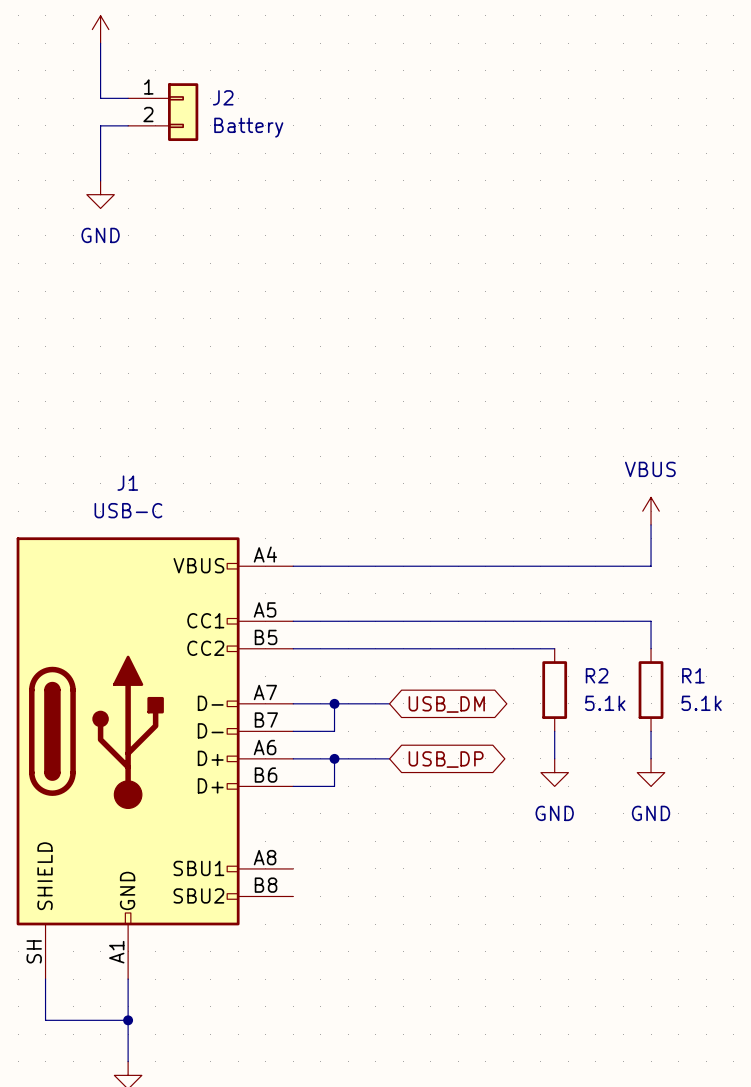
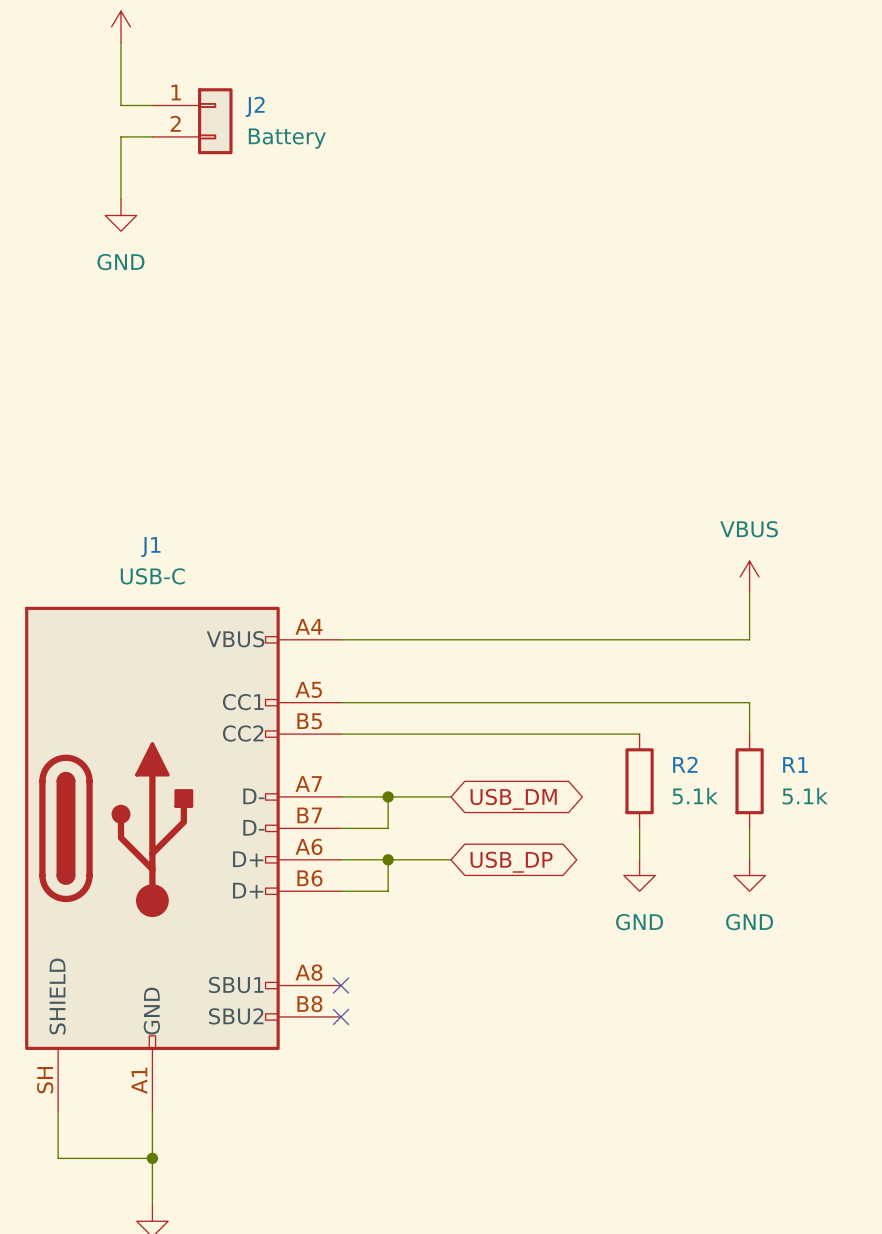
no-connect mark: none -> (340, 985)
no-connect mark: none -> (340, 1016)

